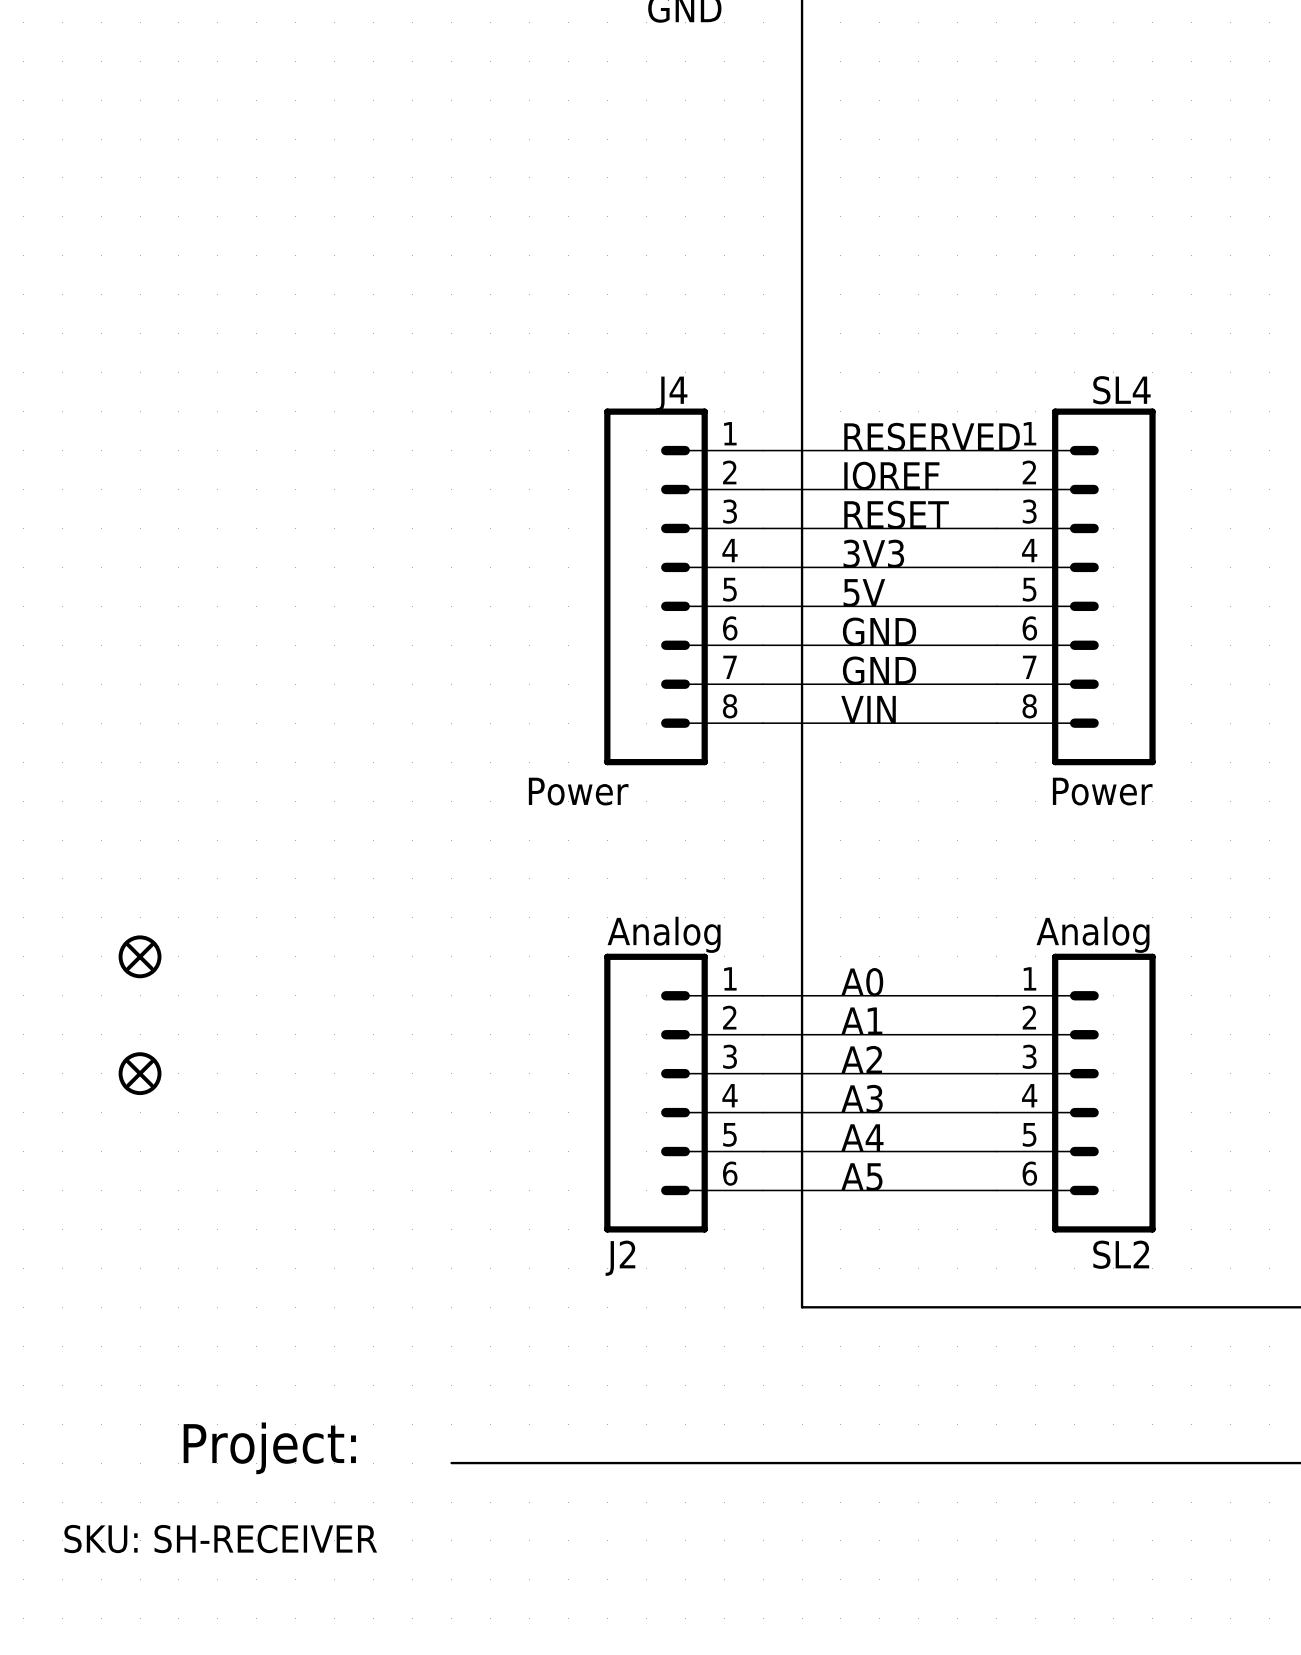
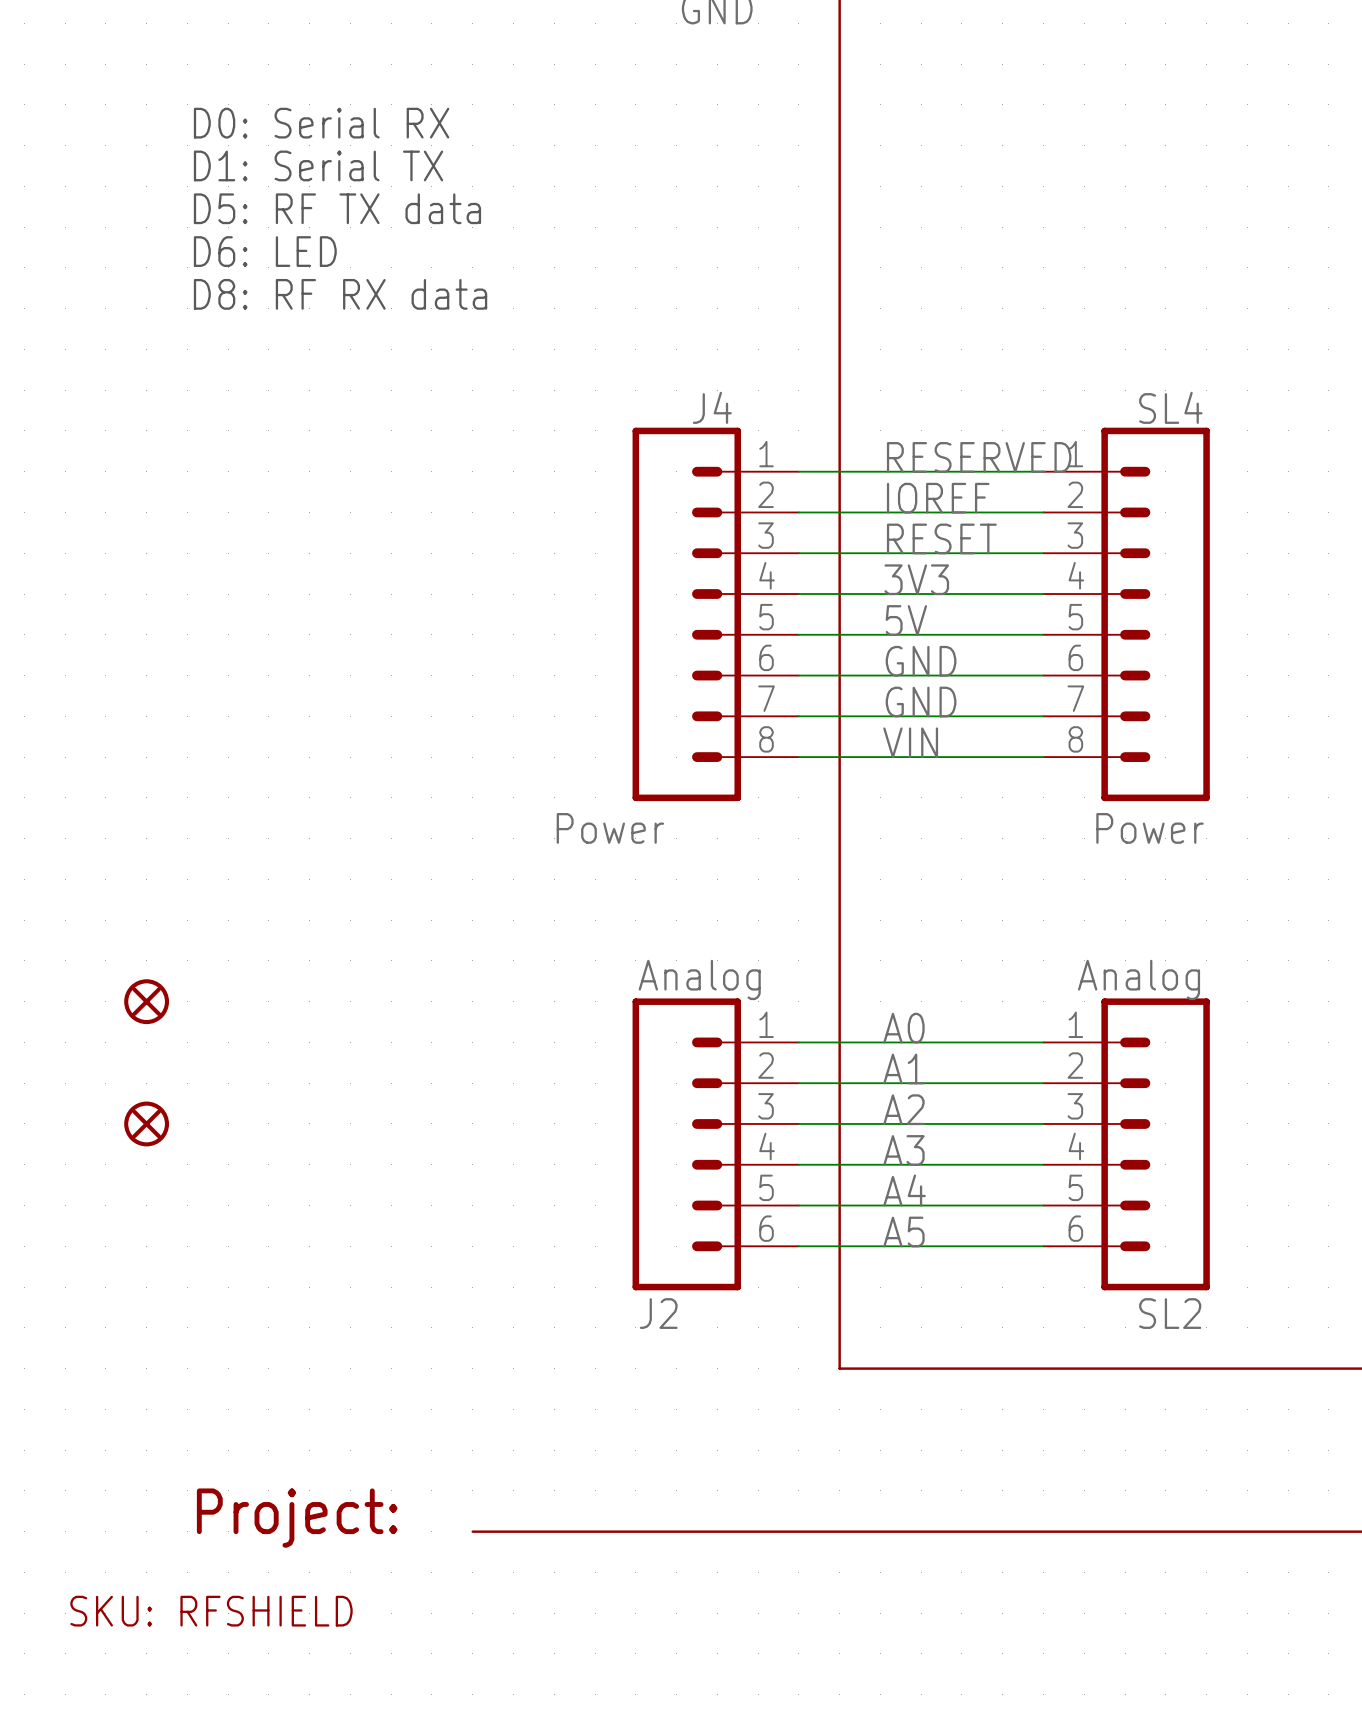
text: none -> D0: Serial RX (321, 123)
text: none -> D1: Serial TX (318, 165)
text: none -> D5: RF TX data (337, 208)
text: none -> D6: LED (265, 251)
text: none -> D8: RF RX data (340, 294)
text: SKU: SH-RECEIVER (220, 1539) -> SKU: RFSHIELD (211, 1611)

